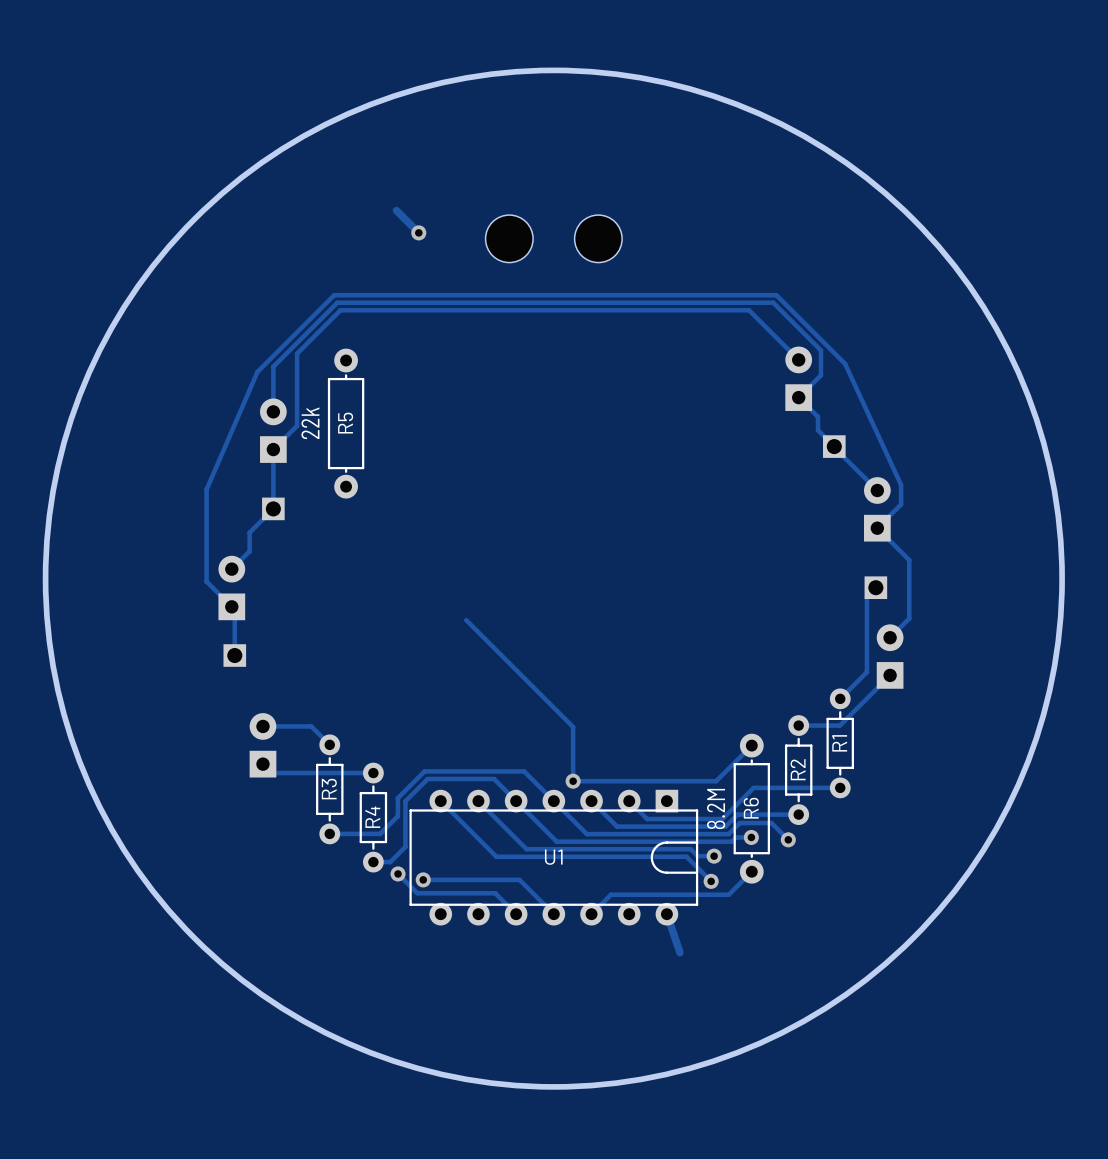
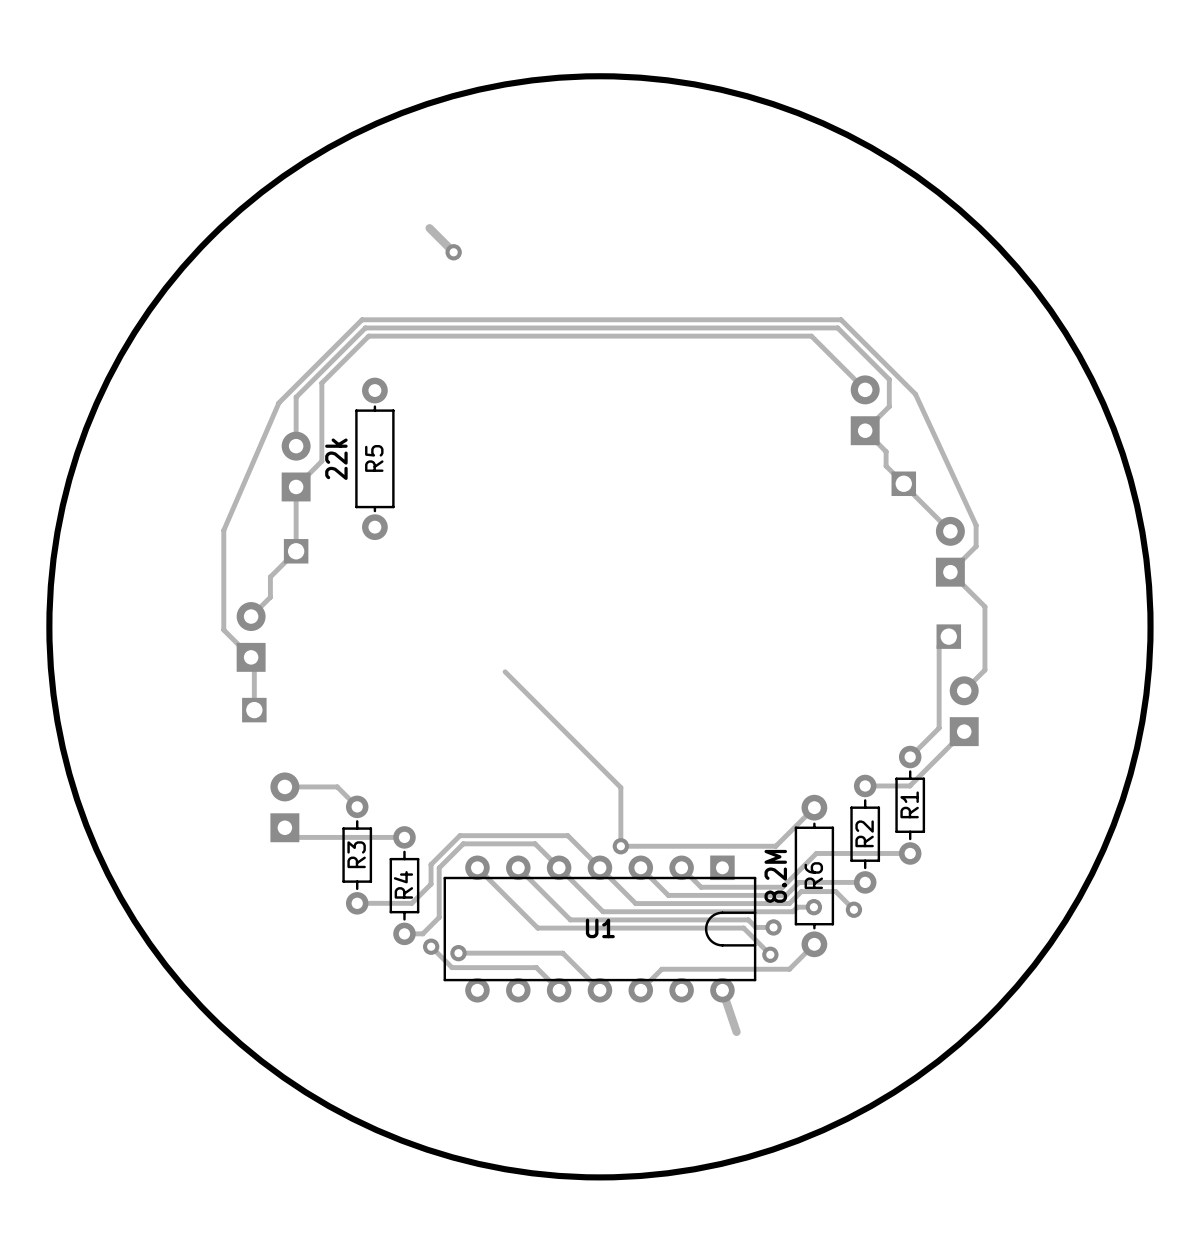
part: (509, 238) -> none
part: (598, 238) -> none

